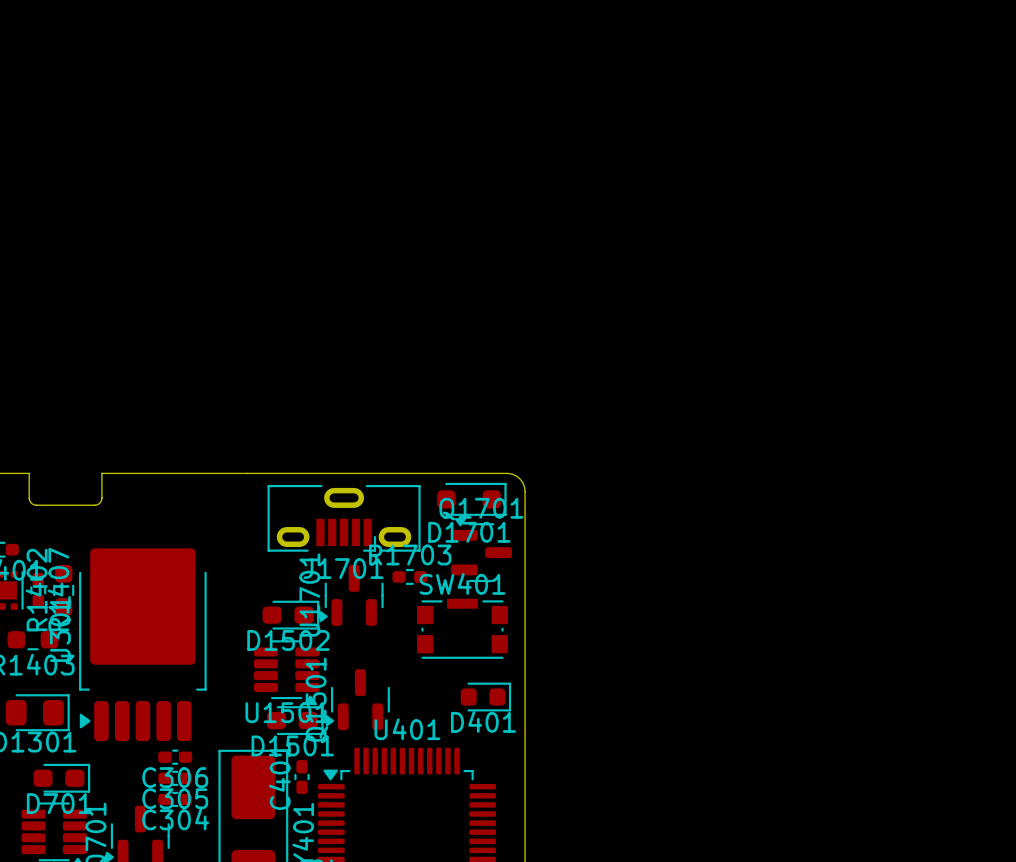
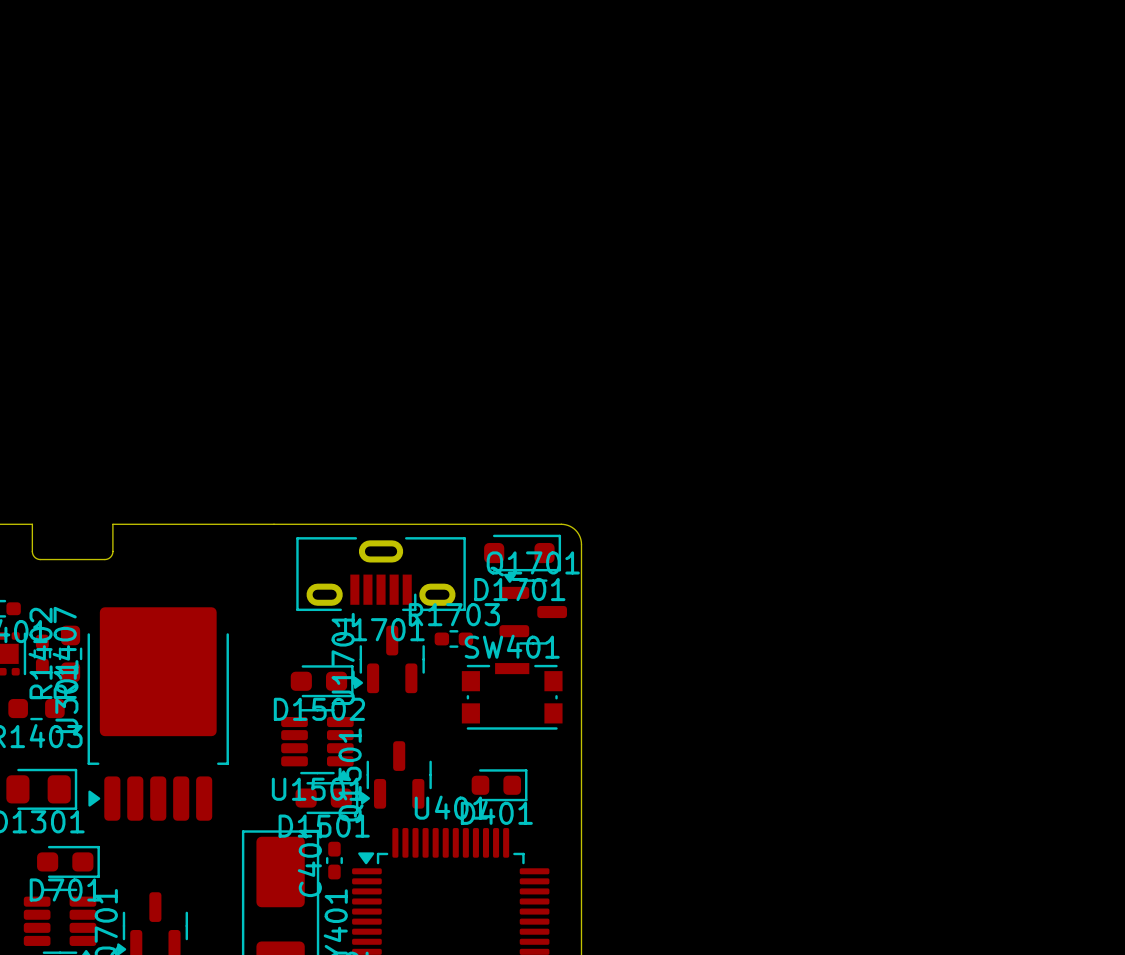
D401 position: (485, 697) -> (499, 785)
C306: (175, 757) -> none
C305: (175, 778) -> none
C304: (175, 799) -> none

